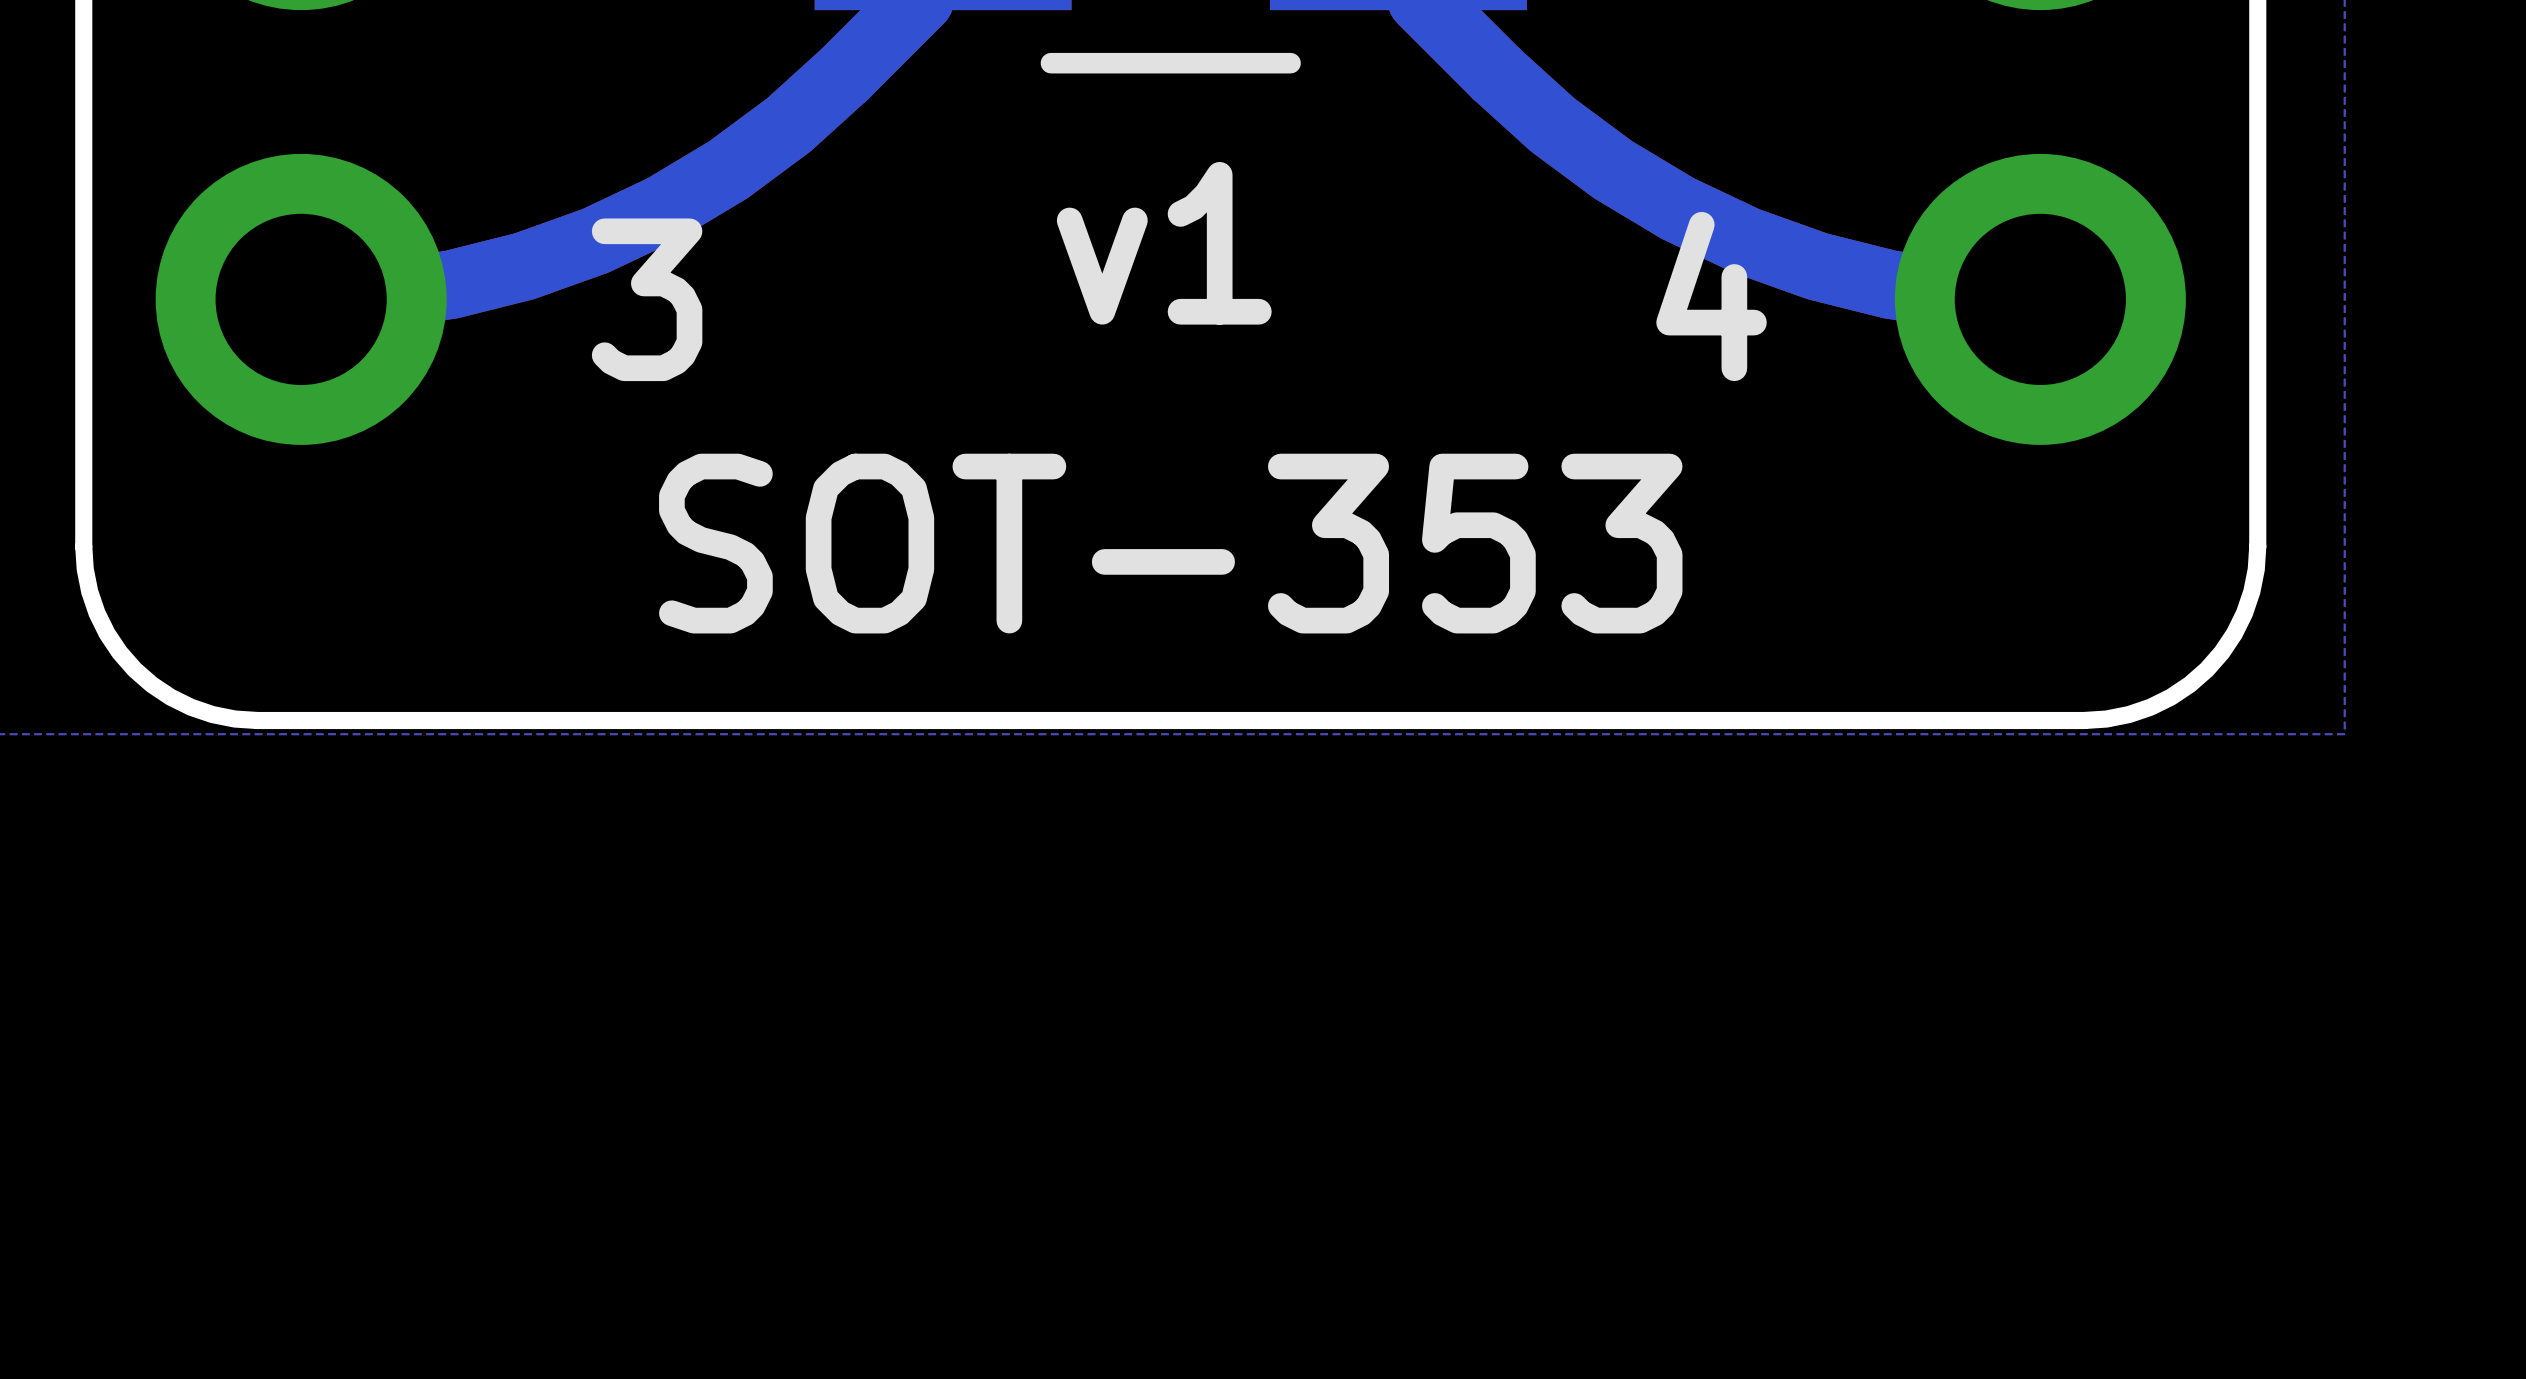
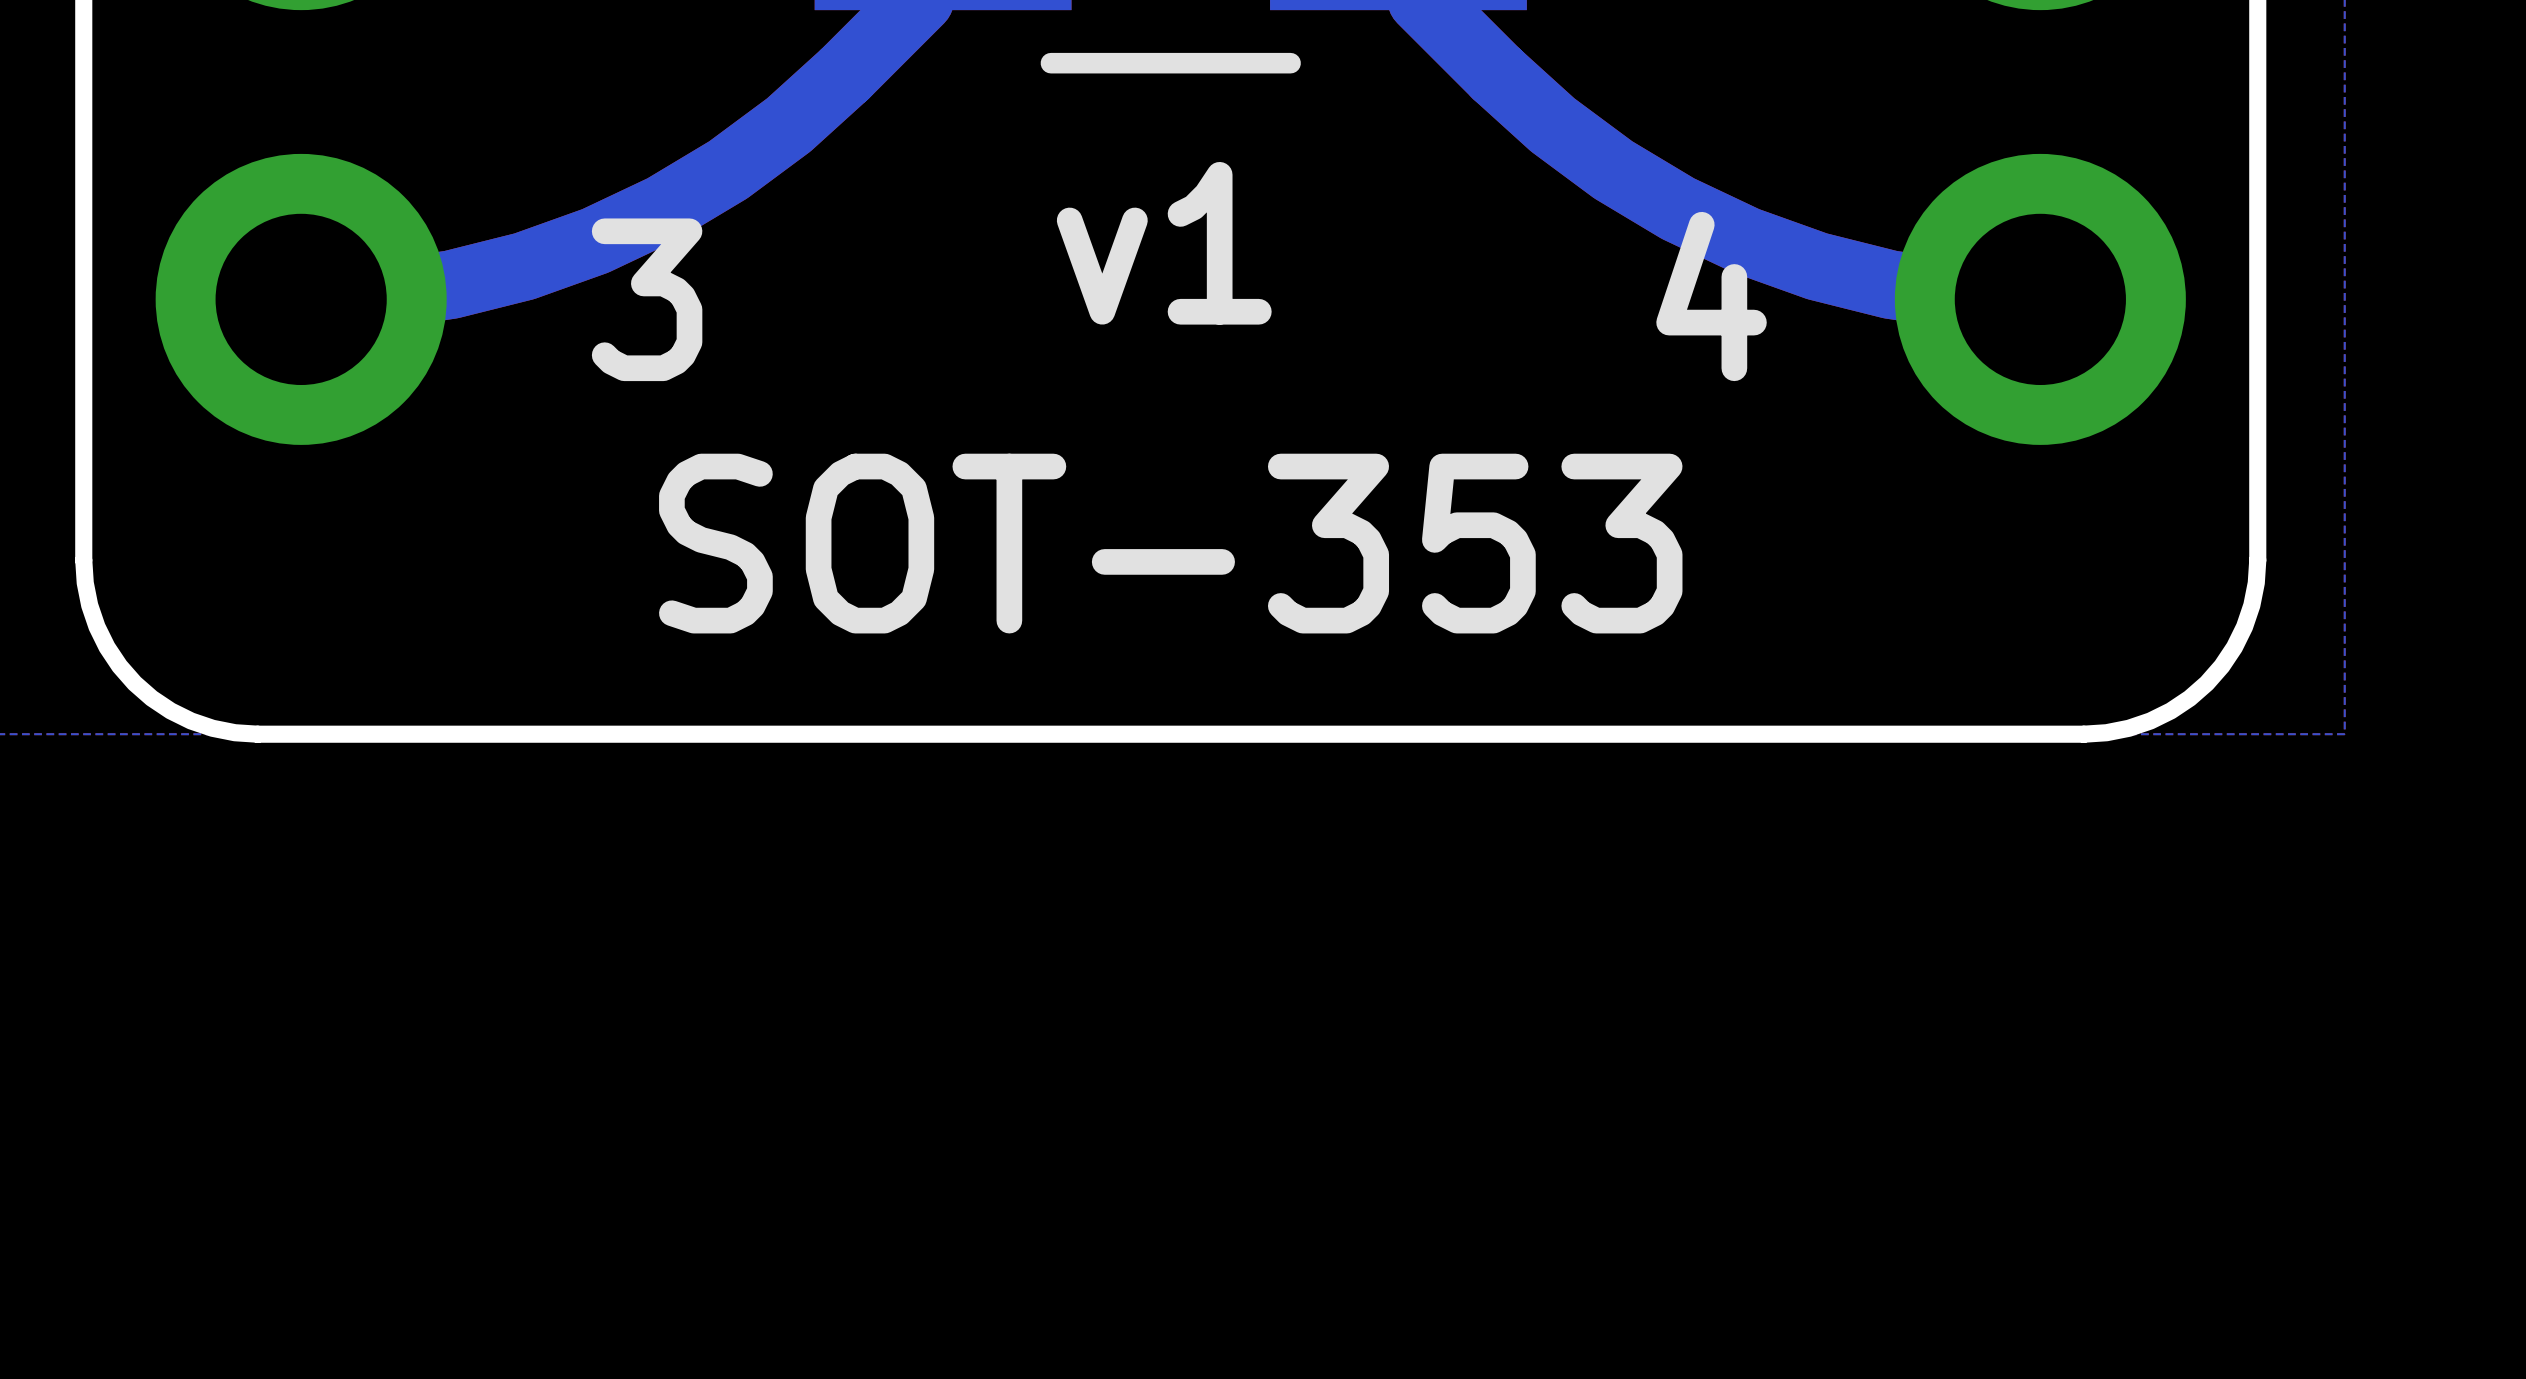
board edge: (2257, 546) (2251, 591) (2244, 613) (2234, 633) (2206, 669) (2170, 697) (2150, 707) (2128, 714) (2083, 720) (234, 719) (212, 714) (170, 697) (134, 669) (107, 633) (97, 613) (89, 591) (83, 546) -> (2257, 546) (2256, 582) (2244, 626) (2234, 647) (2206, 683) (2170, 710) (2150, 720) (2106, 732) (2083, 734) (234, 732) (212, 728) (170, 710) (151, 698) (119, 666) (107, 647) (89, 605) (85, 582) (83, 546)

